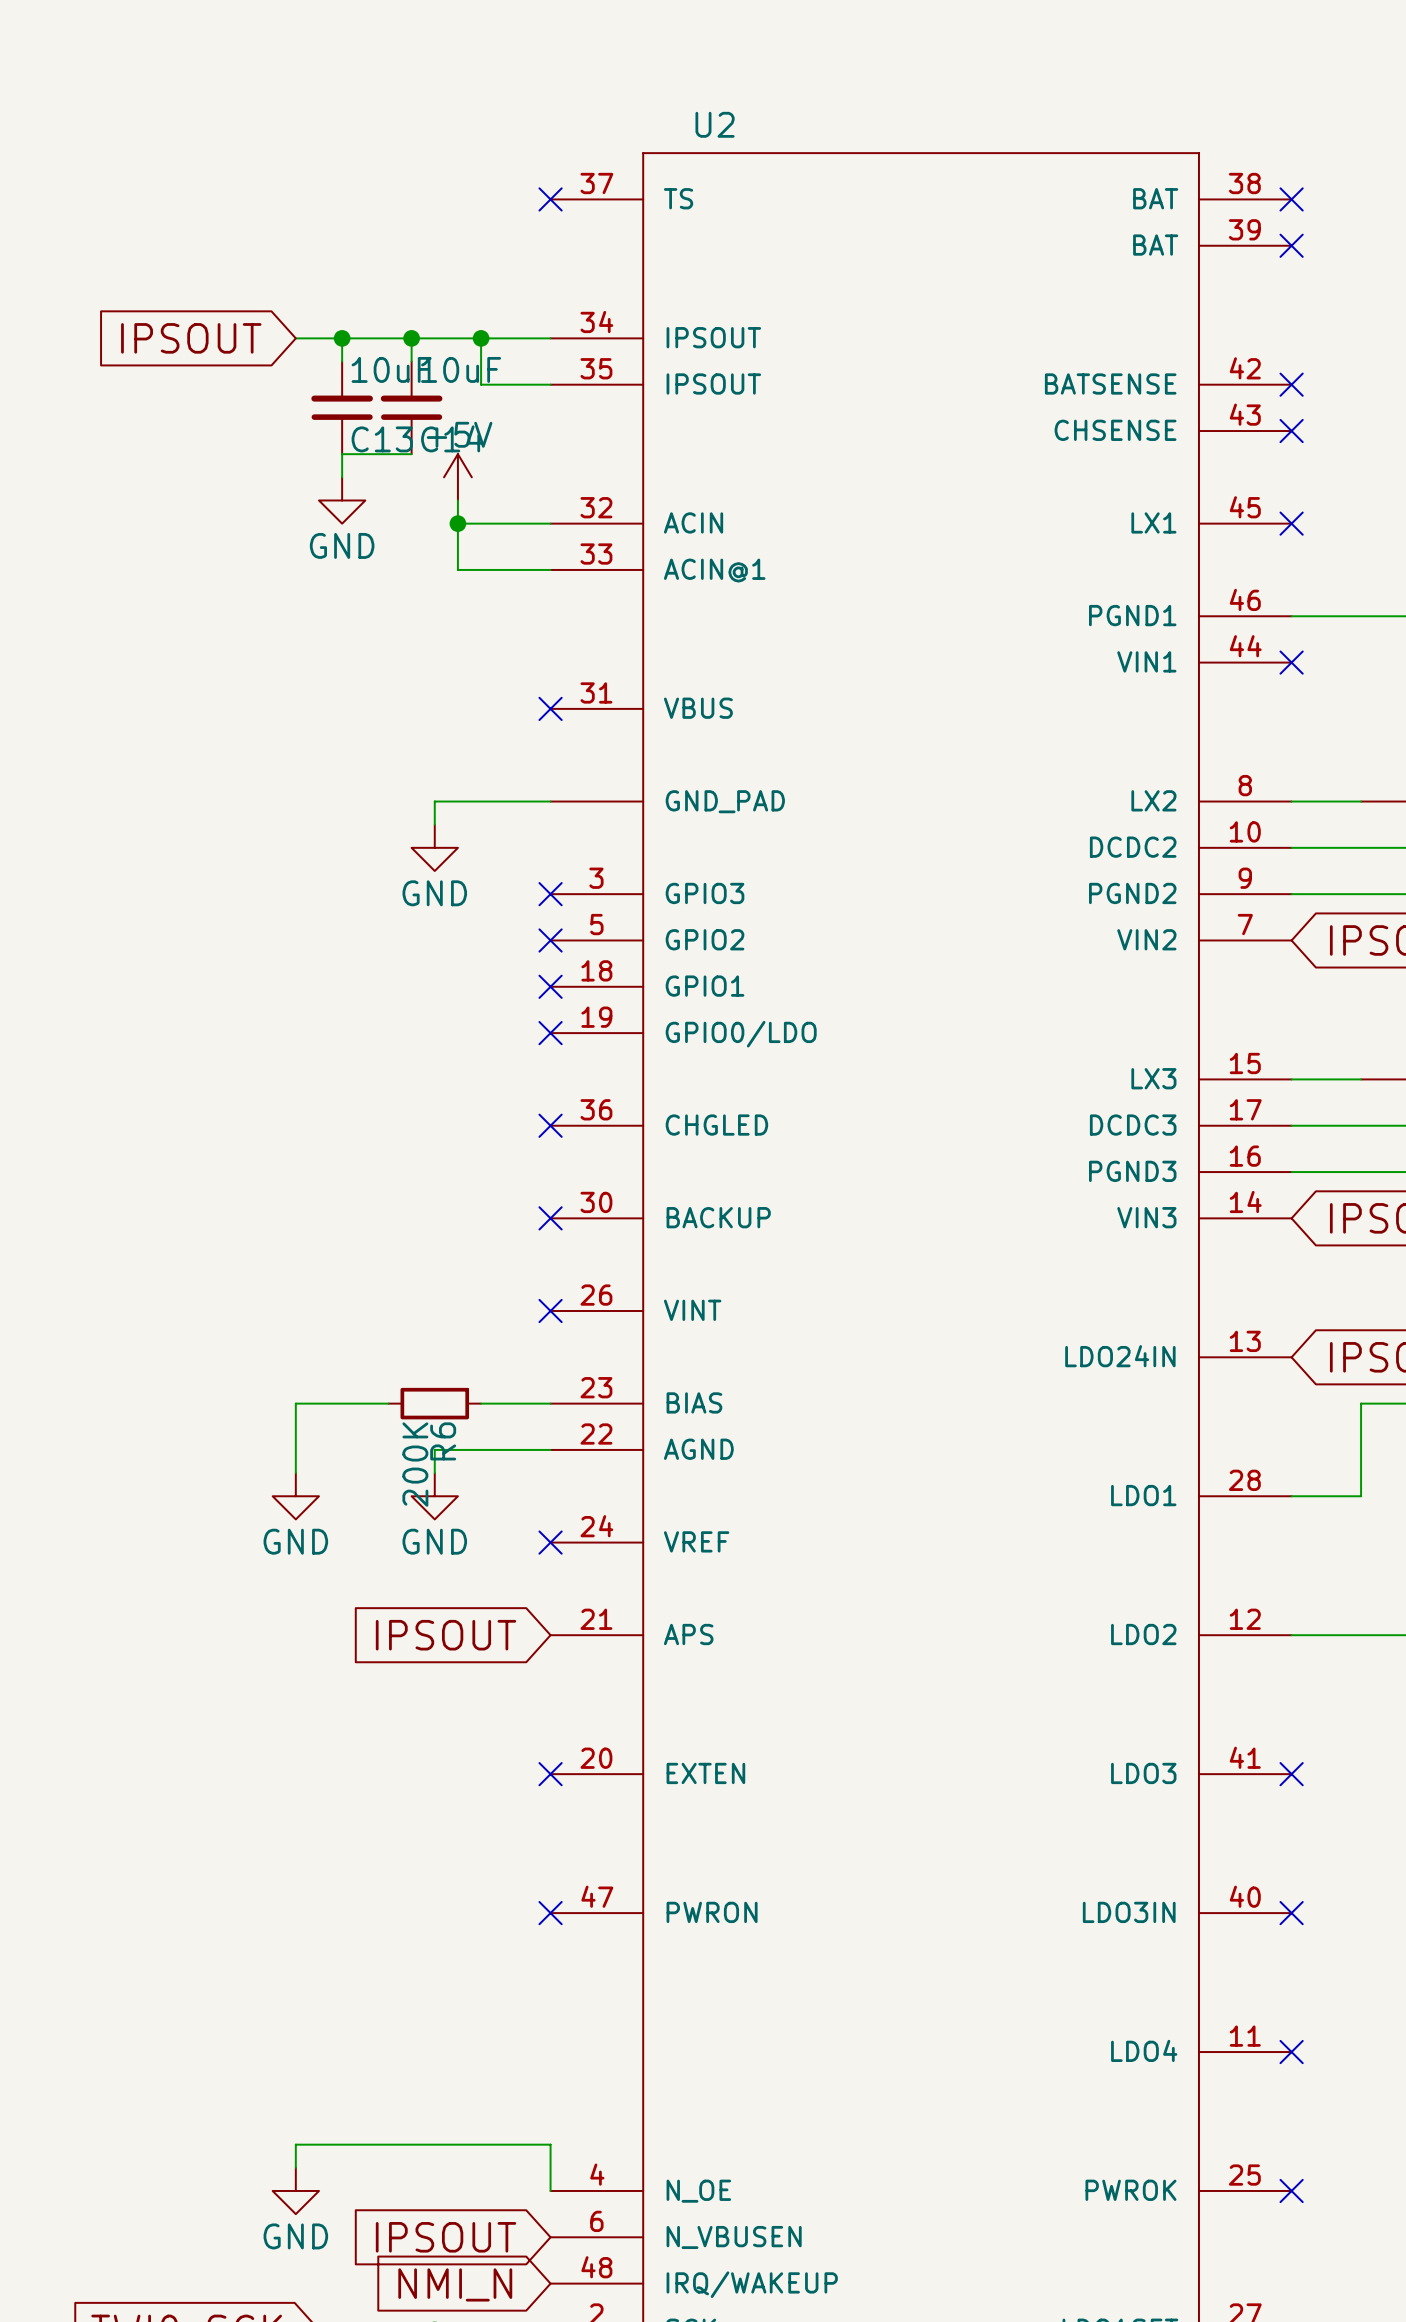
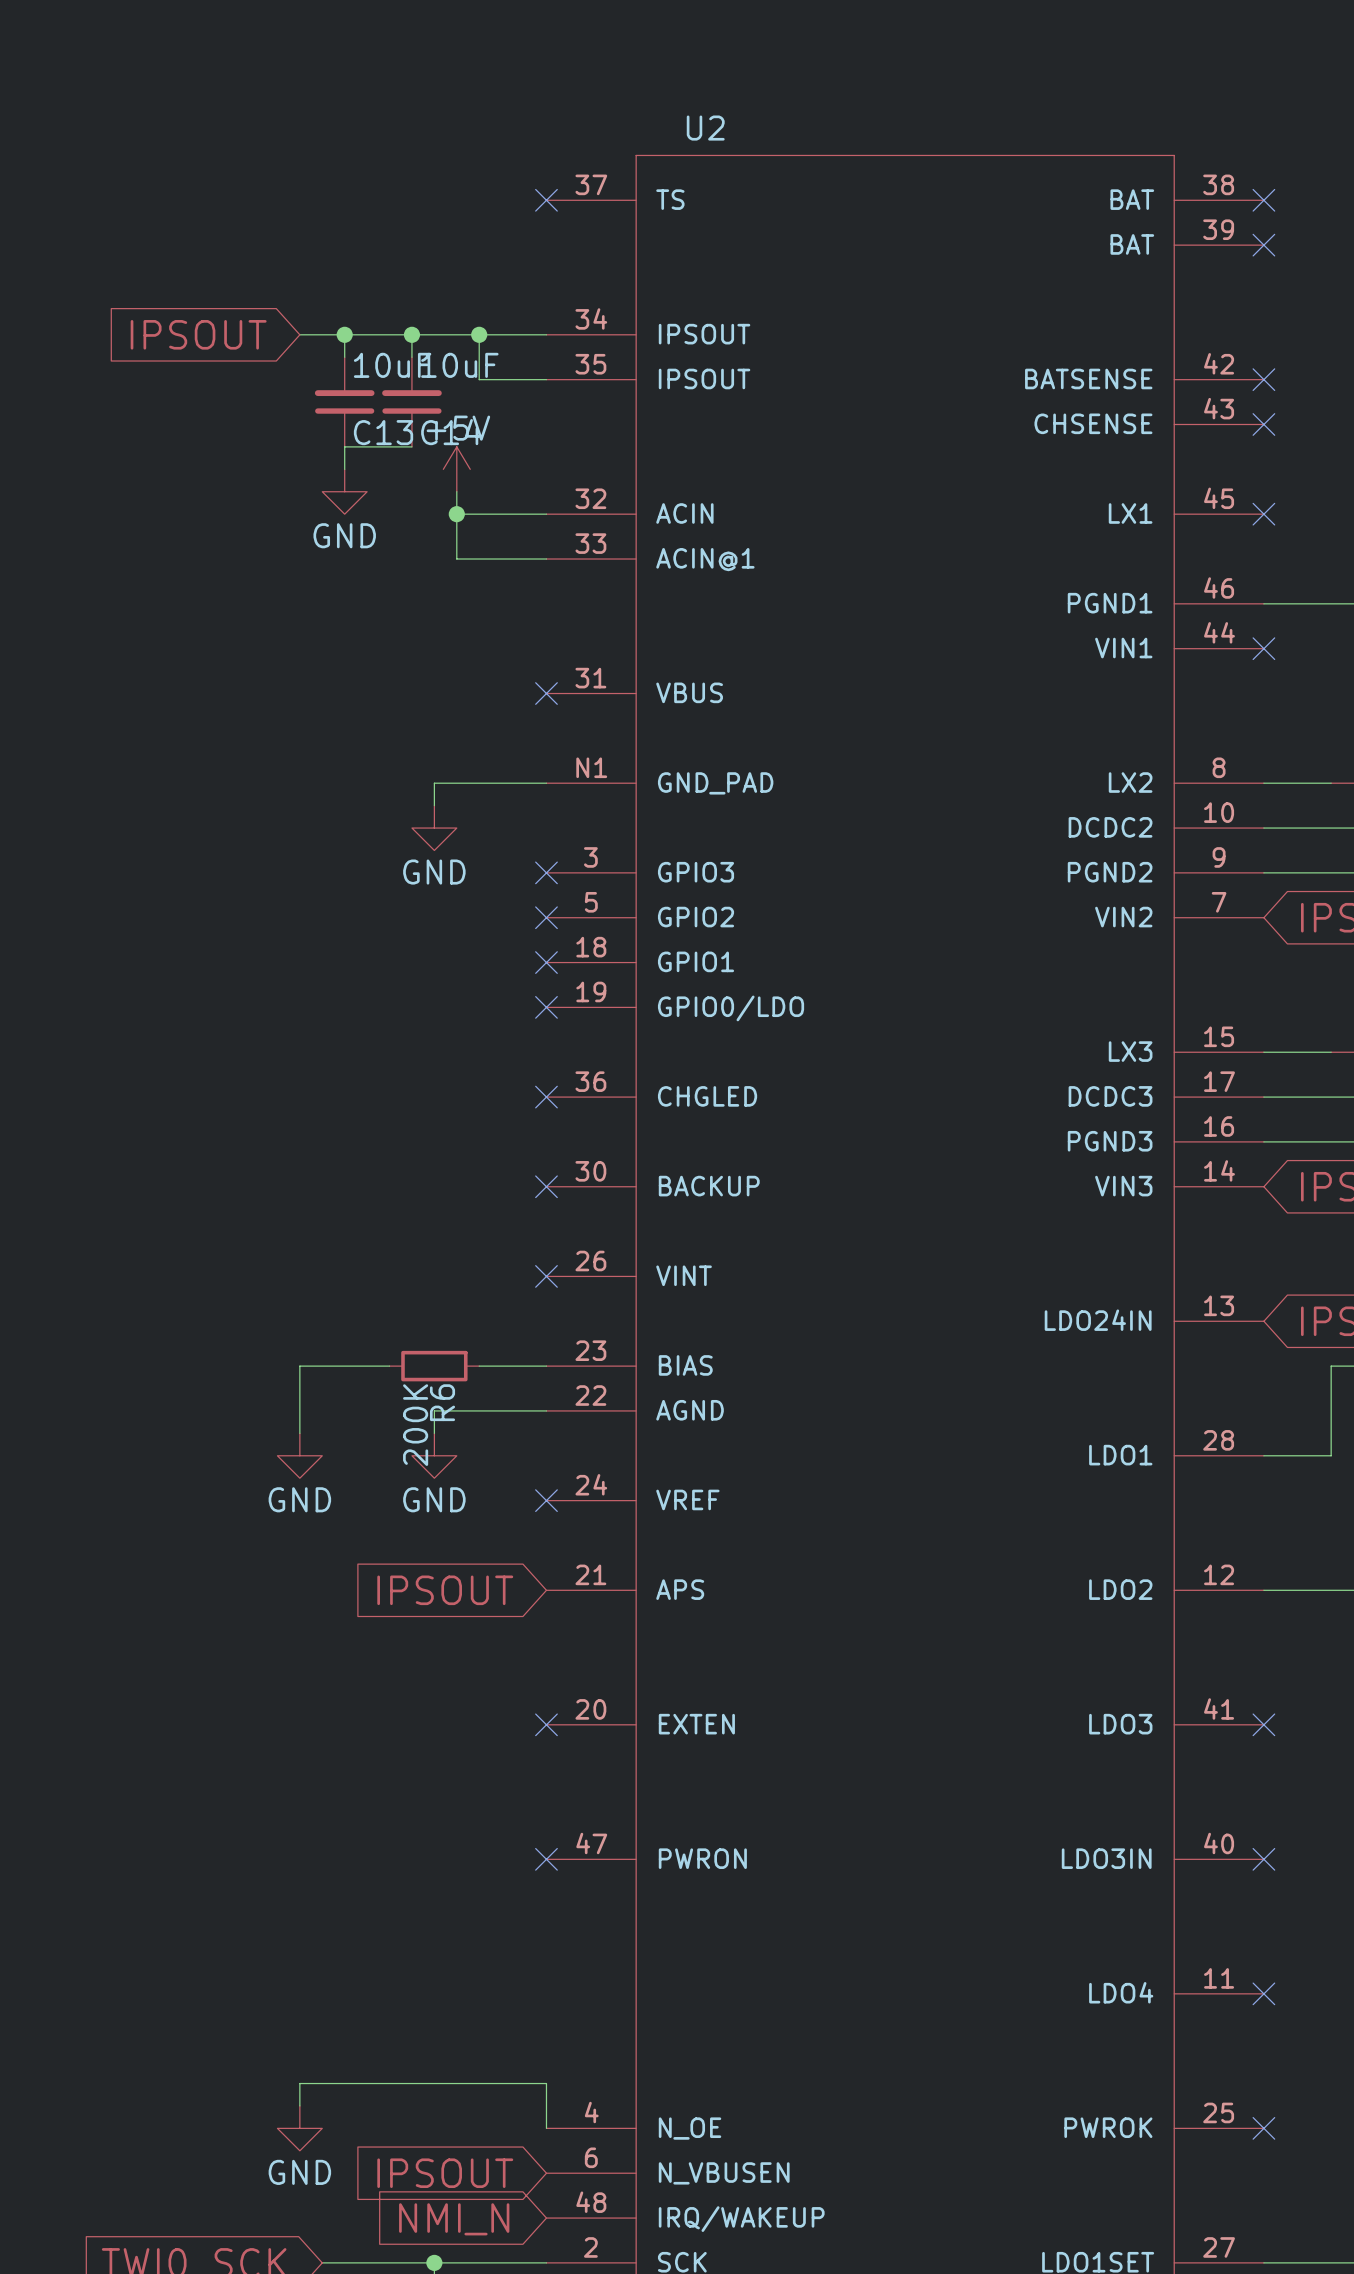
U2 pin number: none -> N1 (591, 767)

